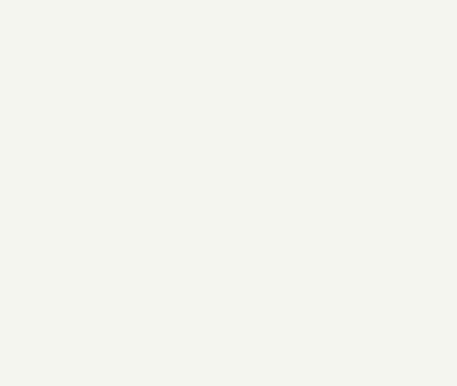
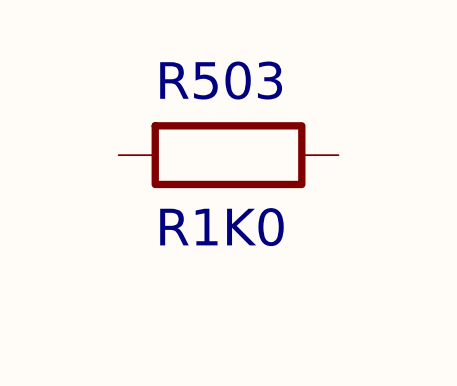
R503: none -> R1K0 (228, 155)

